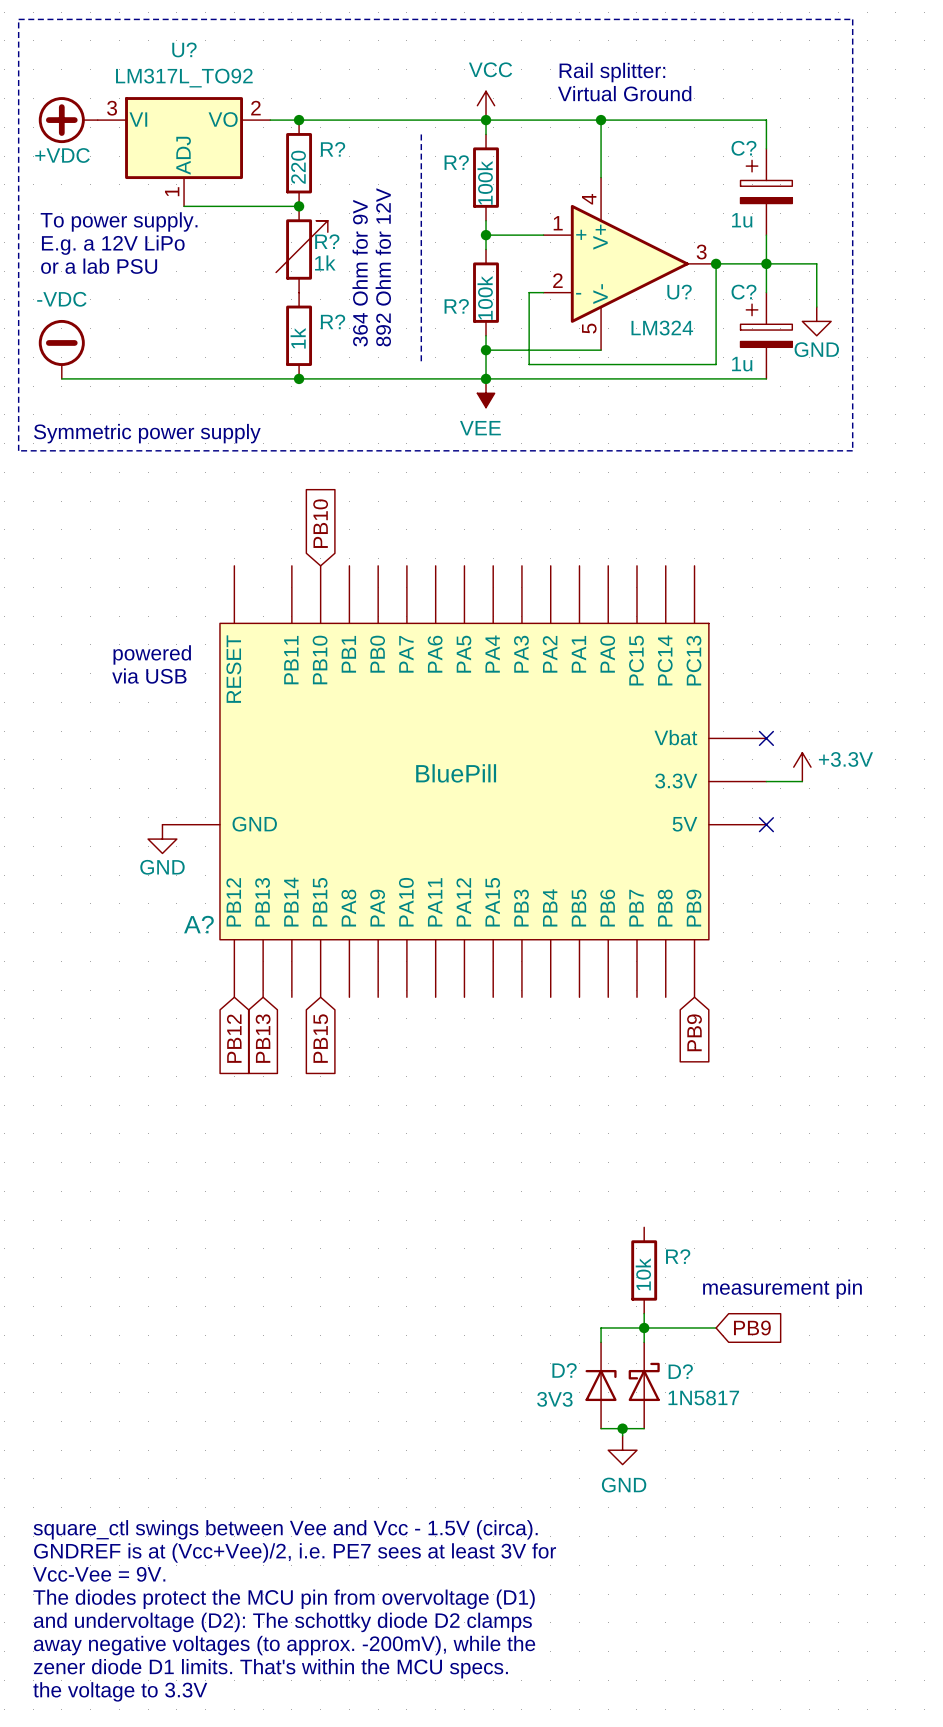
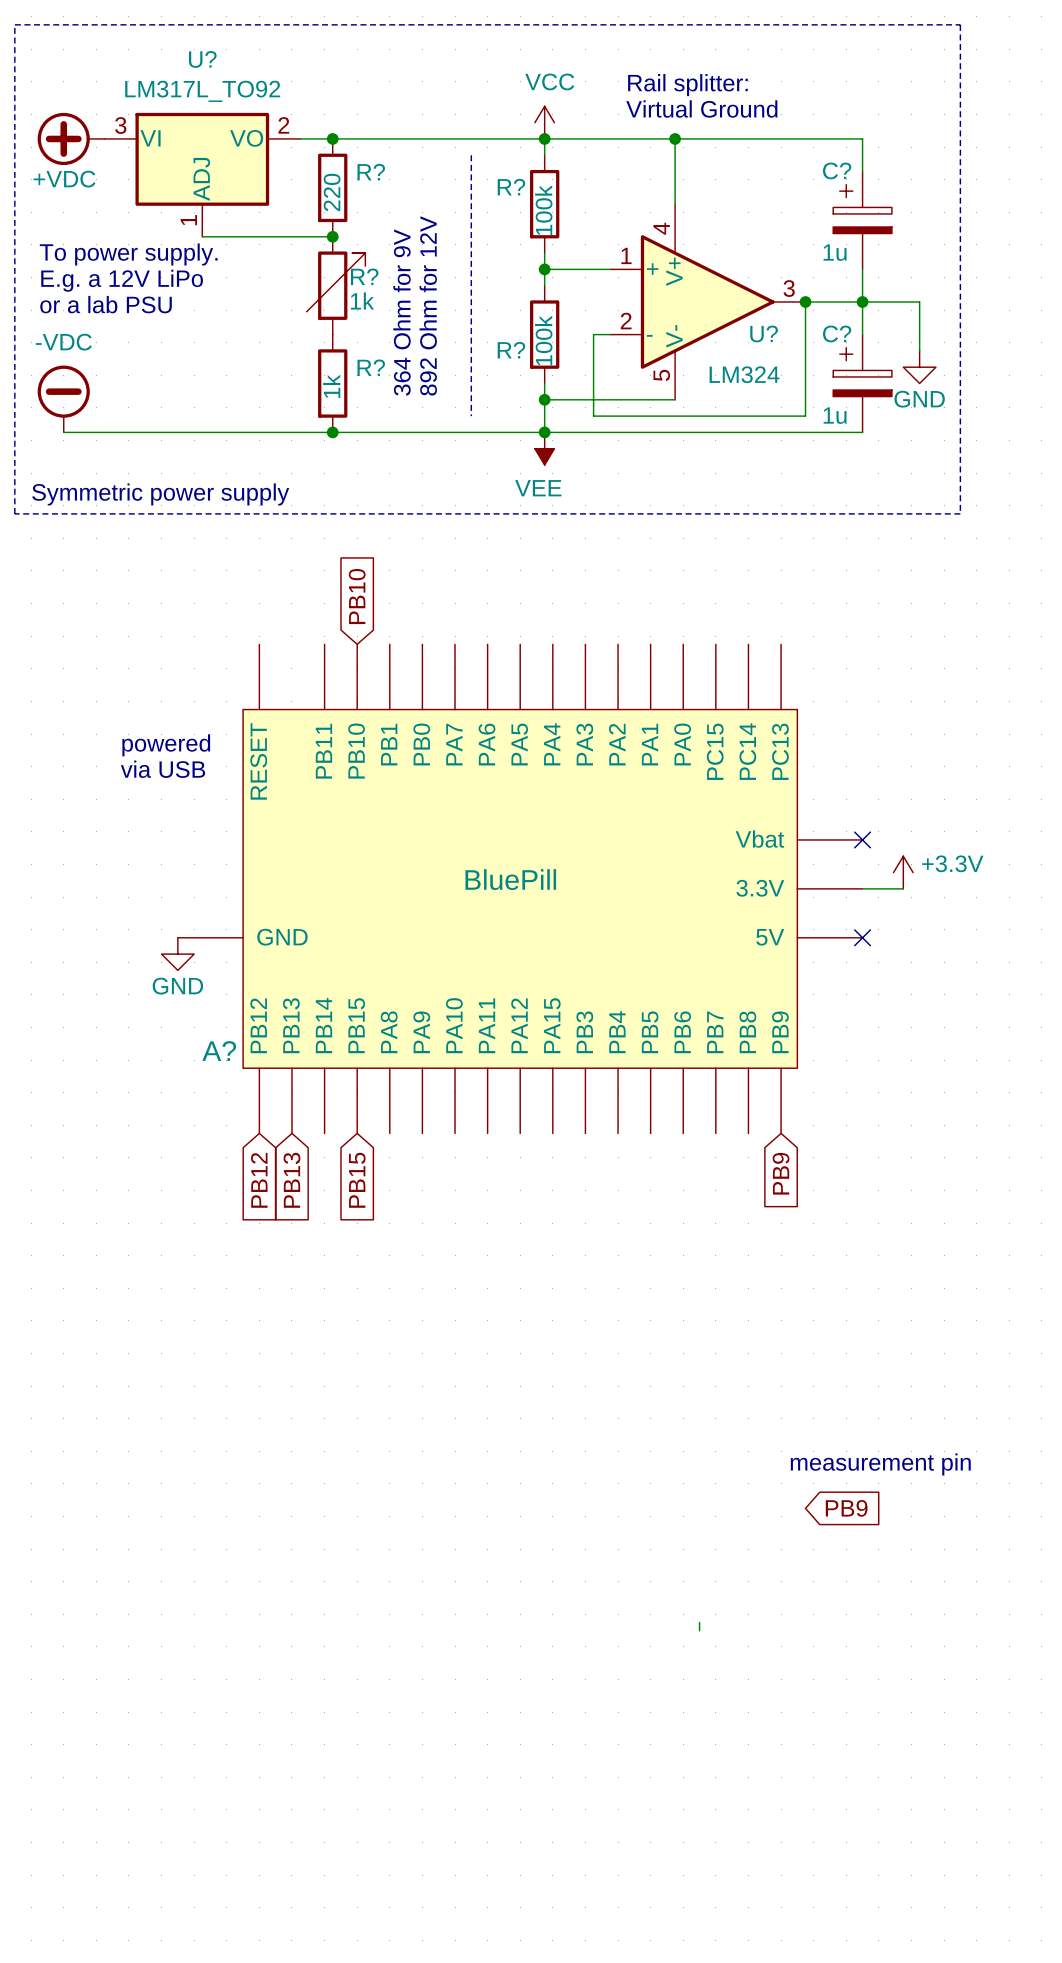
R?: 10k (644, 1270) -> none
wire: (644, 1313) (644, 1342) -> none
junction: (644, 1327) -> none
wire: (716, 1327) (601, 1327) (601, 1342) -> none
D?: 3V3 (601, 1385) -> none
D?: 1N5817 (644, 1385) -> none
wire: (601, 1428) (644, 1428) -> none
junction: (622, 1428) -> none
power symbol: GND (622, 1450) -> none
text: square_ctl swings between Vee and Vcc - 1.5V (circa). (285, 1529) -> none
text: GNDREF is at (Vcc+Vee)/2, i.e. PE7 sees at least 3V for (295, 1552) -> none
text: Vcc-Vee = 9V. (99, 1574) -> none
text: The diodes protect the MCU pin from overvoltage (D1) (284, 1599) -> none
text: and undervoltage (D2): The schottky diode D2 clamps (282, 1622) -> none
text: away negative voltages (to approx. -200mV), while the (284, 1645) -> none
text: zener diode D1 limits. That's within the MCU specs. (270, 1668) -> none
text: the voltage to 3.3V (120, 1691) -> none

